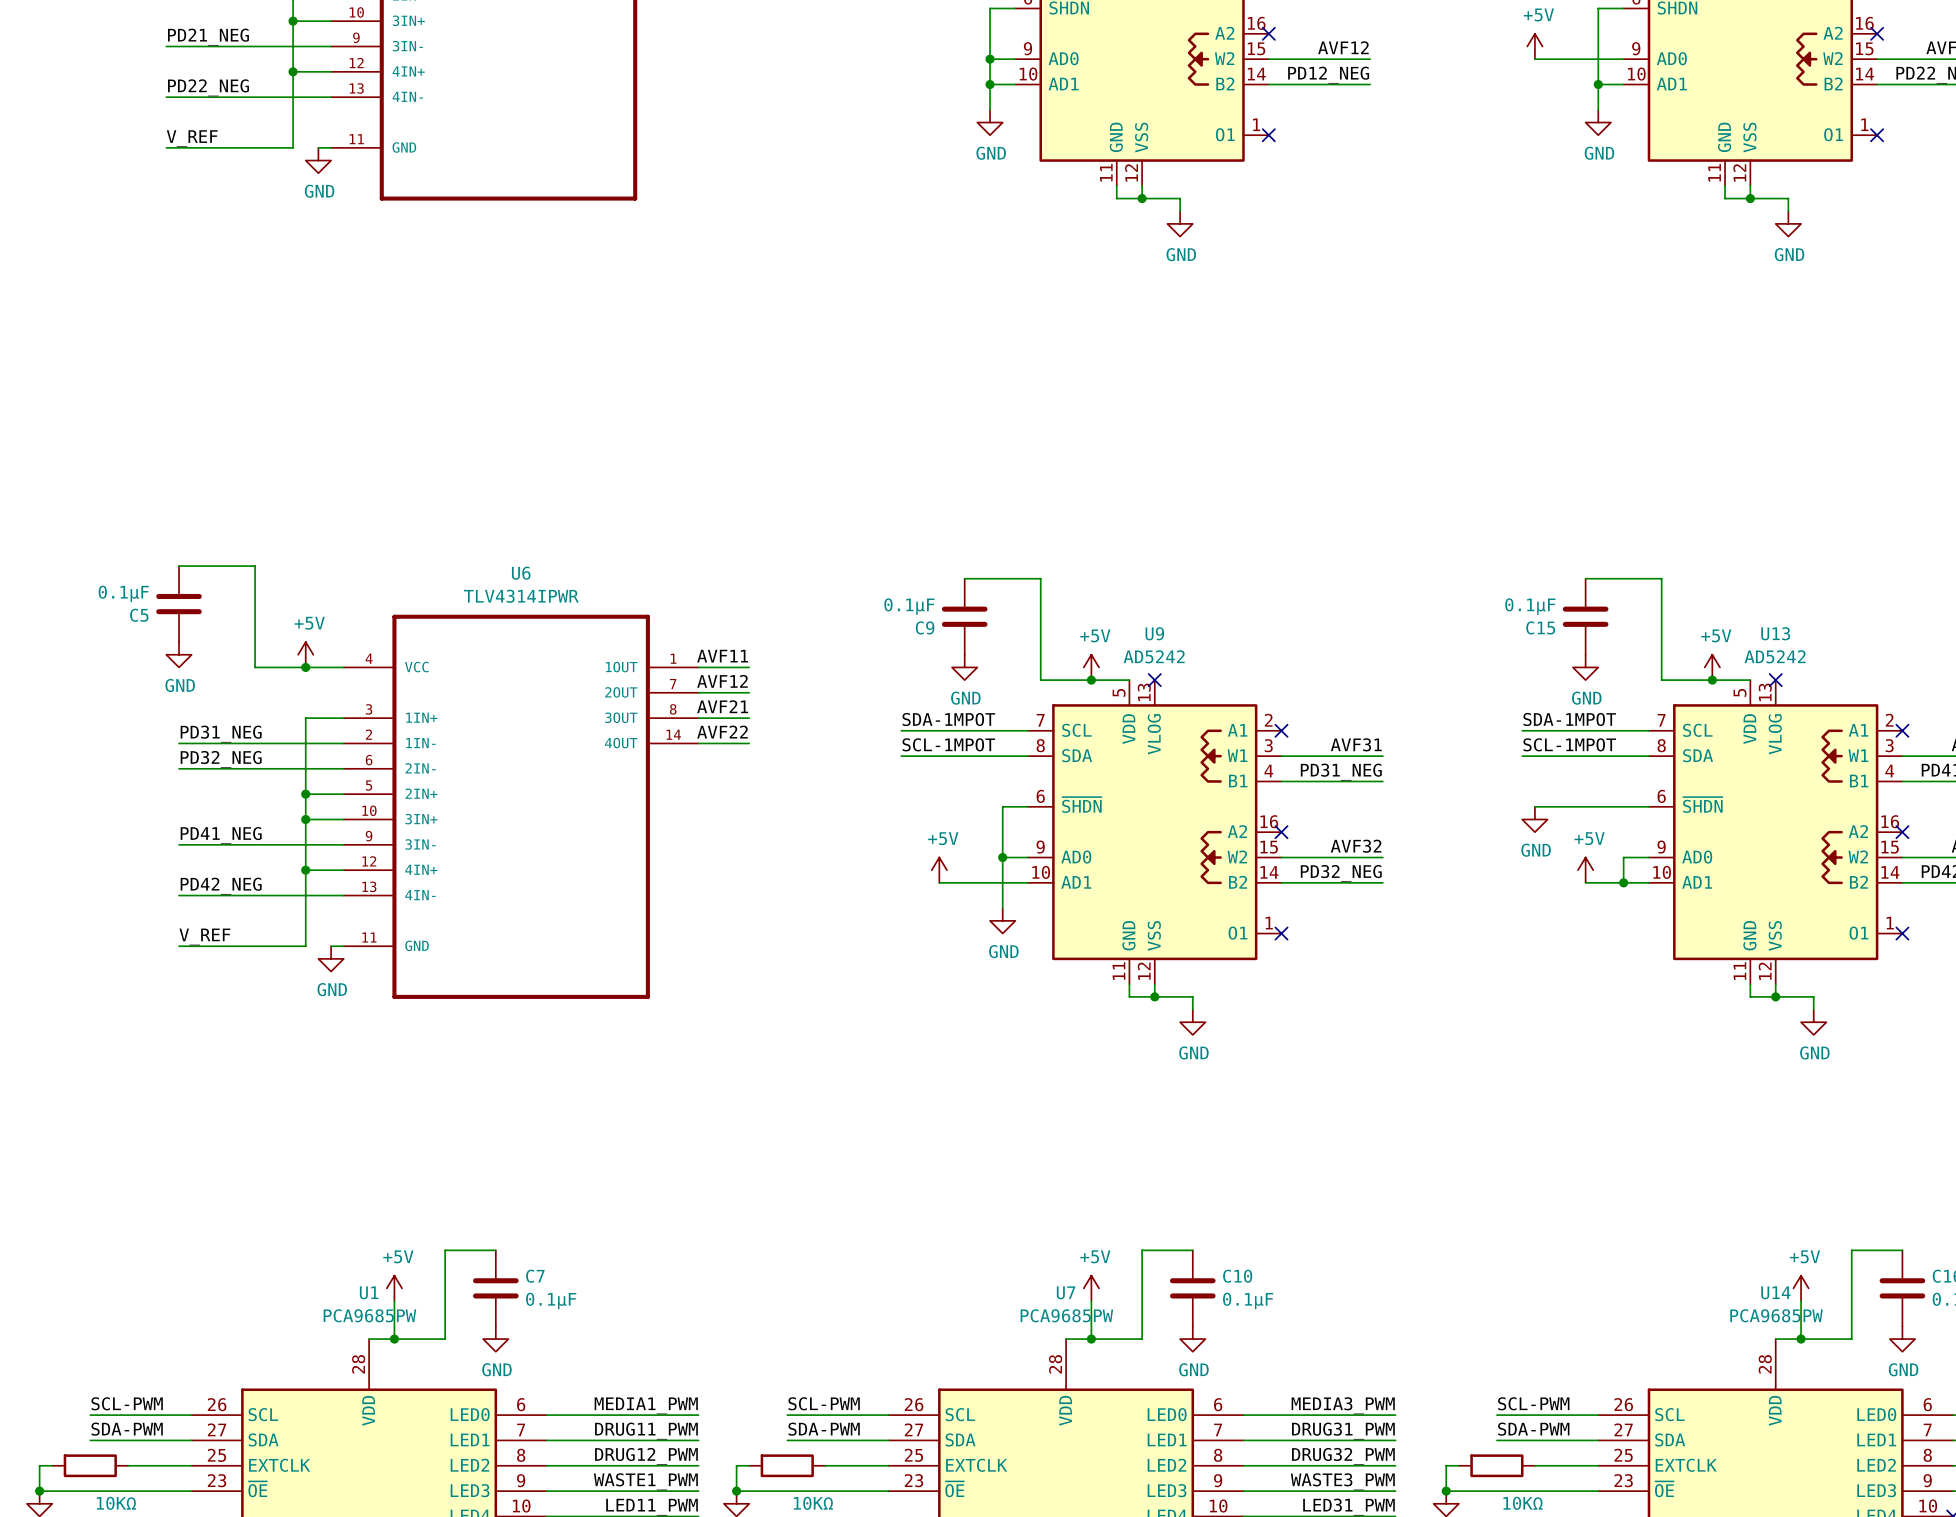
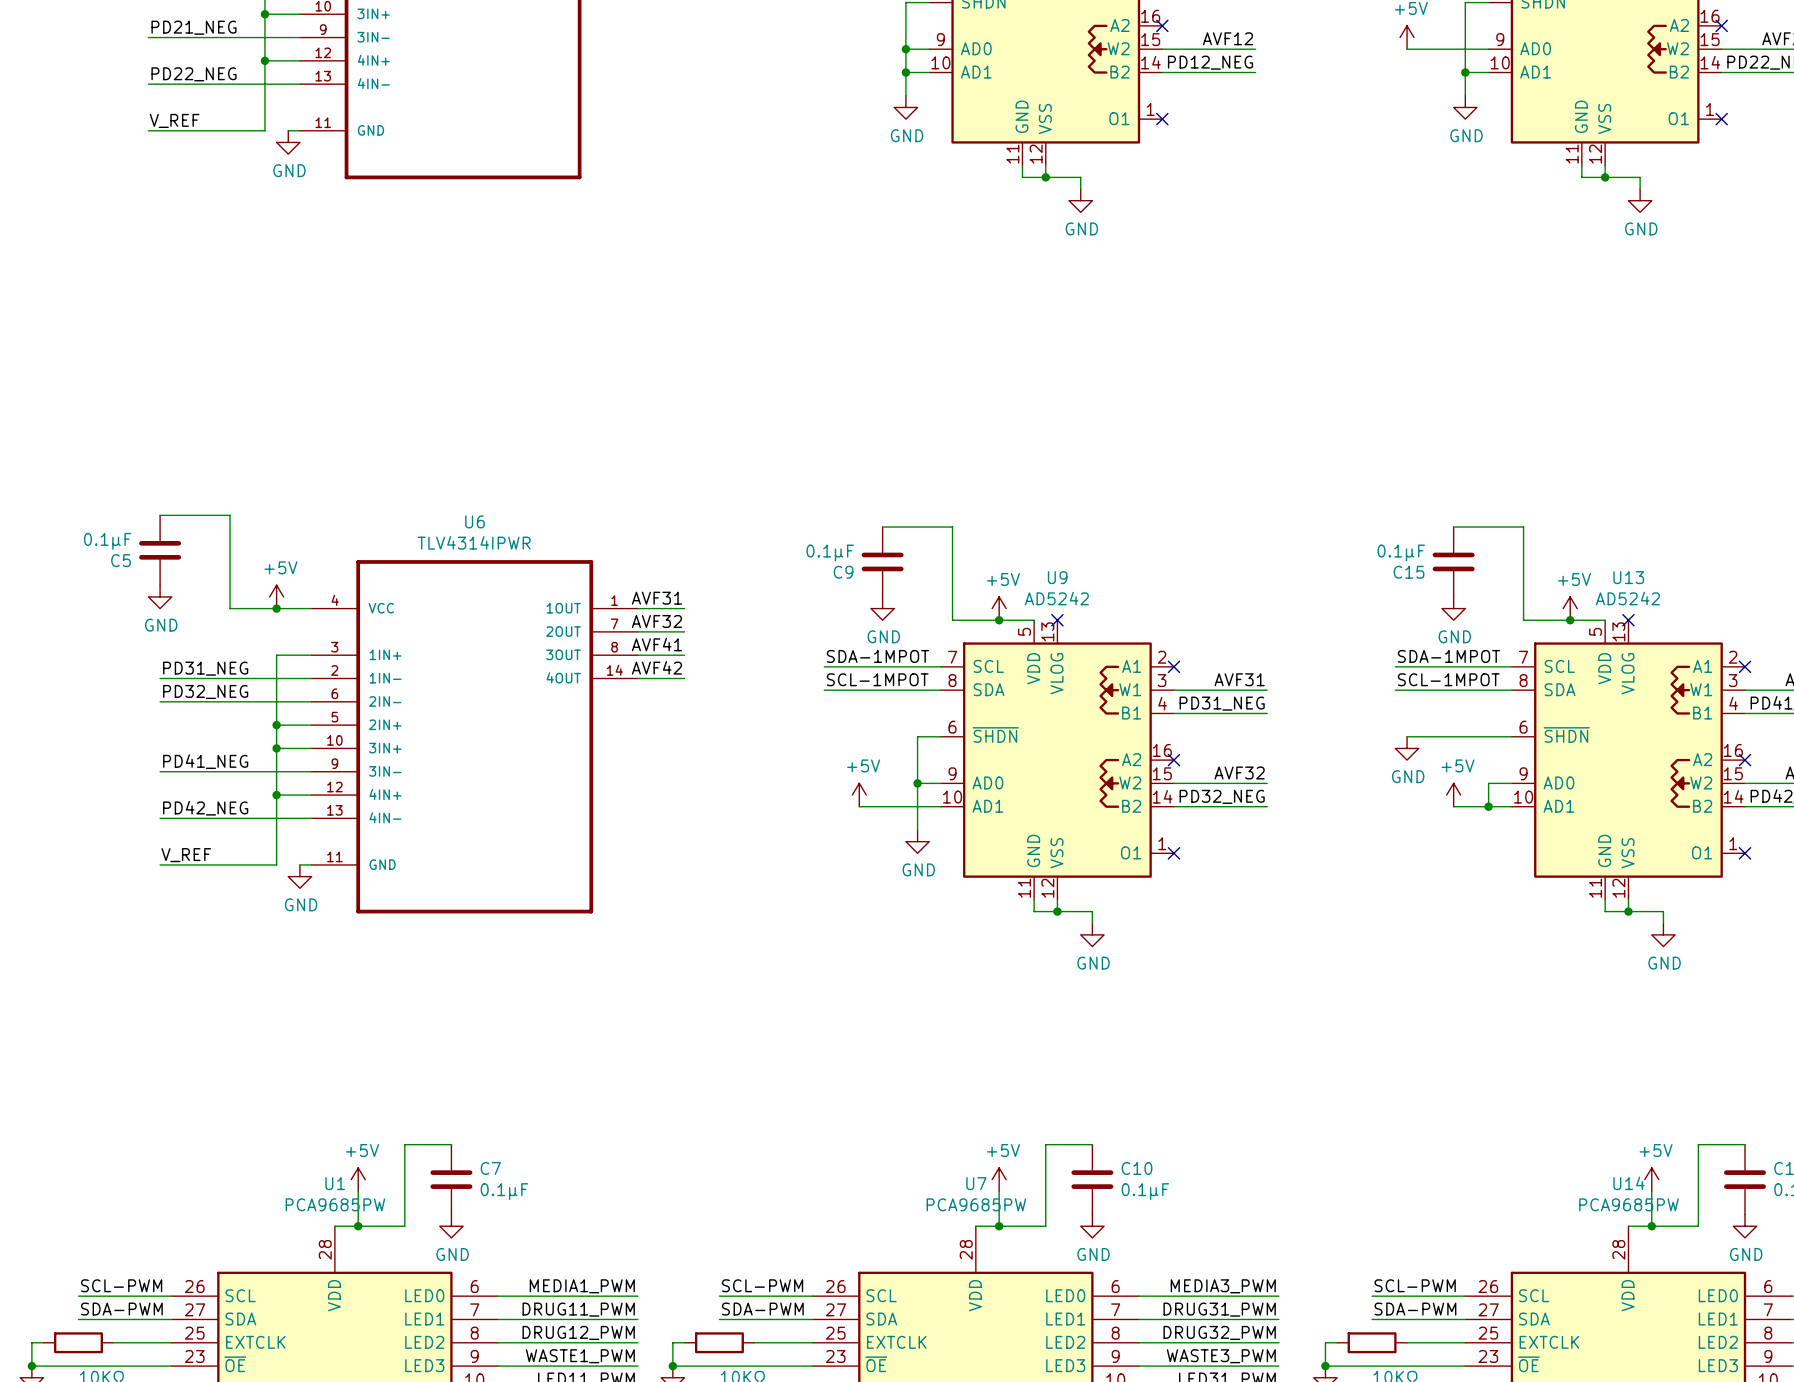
label: AVF11 (722, 656) -> AVF31 (656, 598)
label: AVF12 (722, 681) -> AVF32 (656, 621)
label: AVF21 (722, 706) -> AVF41 (656, 644)
label: AVF22 (722, 732) -> AVF42 (656, 667)

